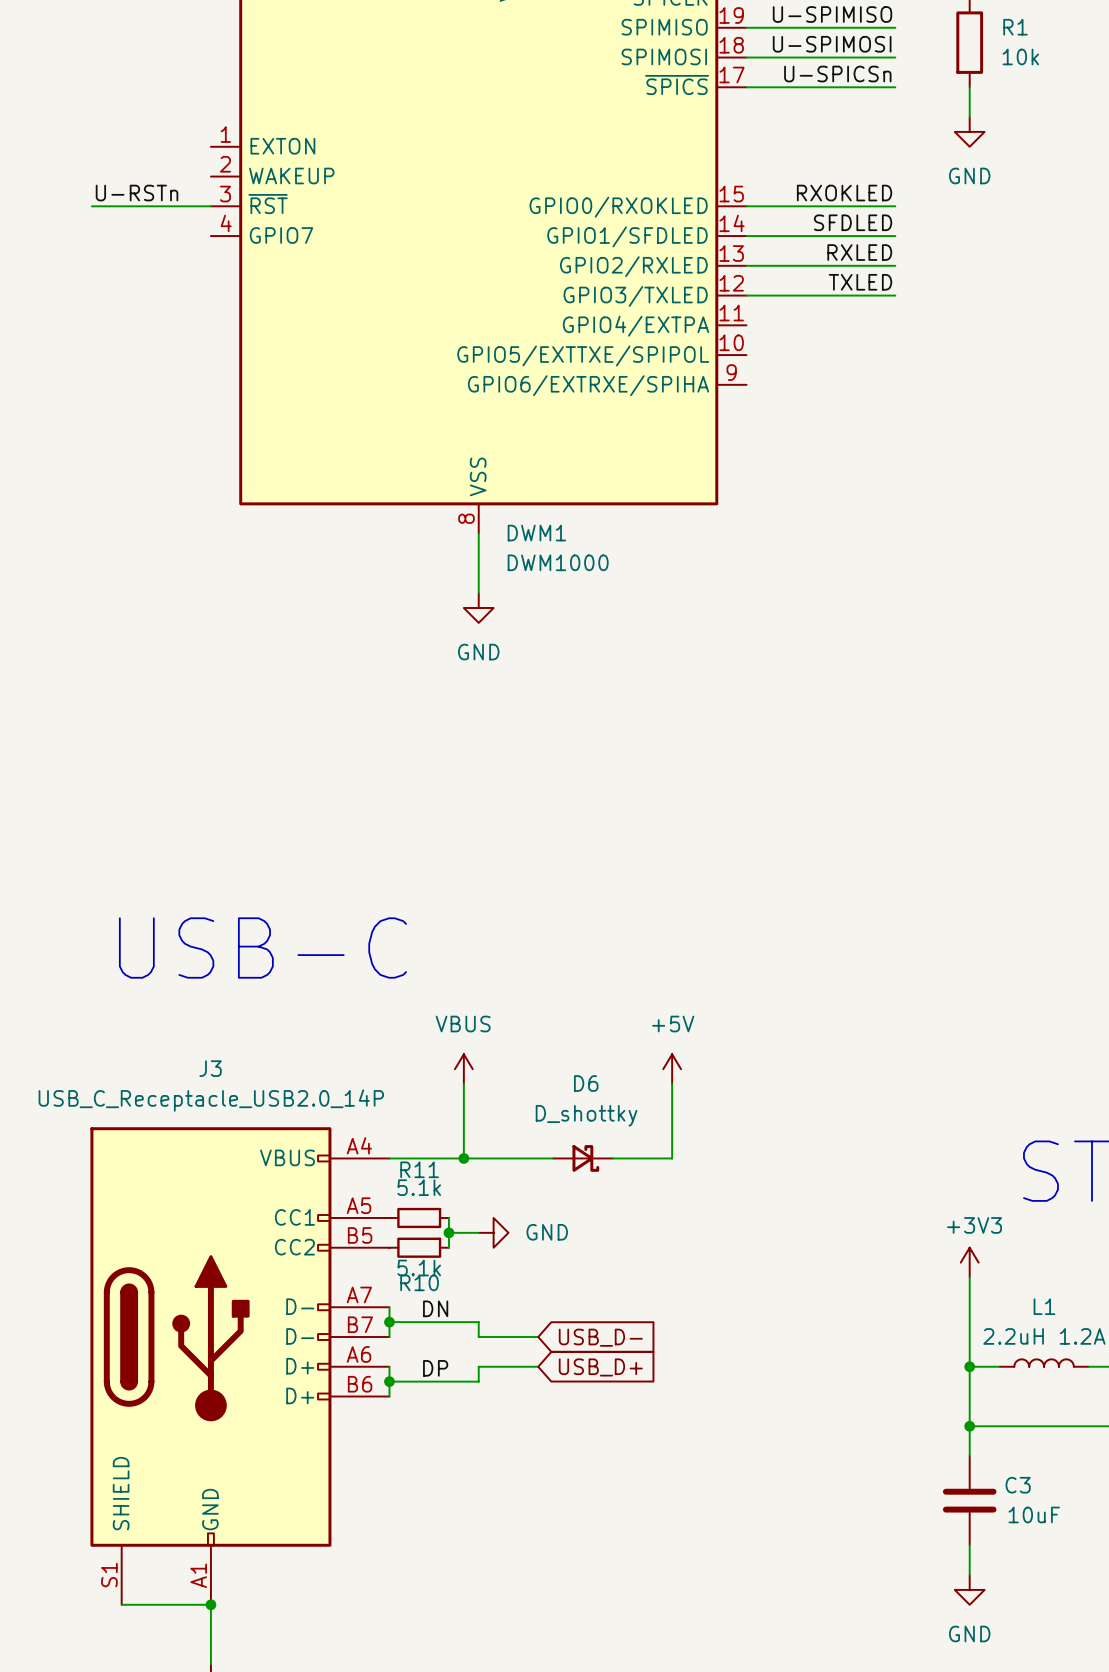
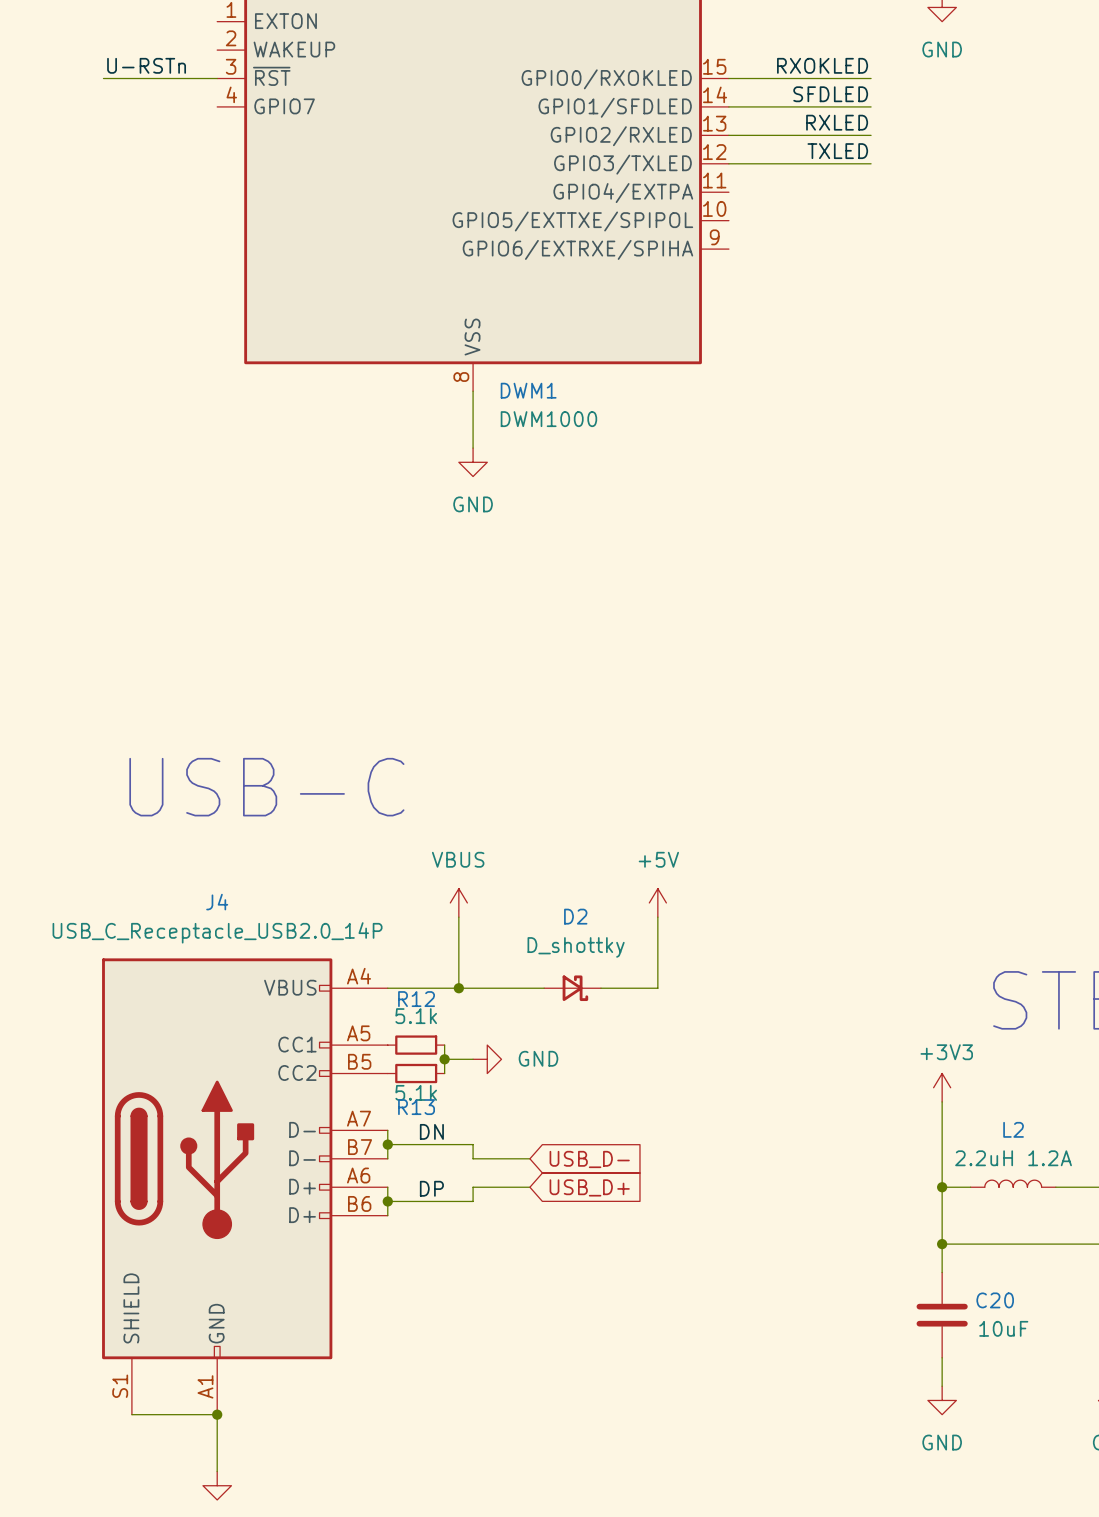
J3 name: J3 (210, 1068) -> J4 (217, 902)
D6 name: D6 (586, 1083) -> D2 (575, 916)
R11 name: R11 (419, 1169) -> R12 (416, 999)
R10 name: R10 (419, 1282) -> R13 (416, 1107)
L1 name: L1 (1044, 1306) -> L2 (1013, 1129)
C3 name: C3 (1018, 1485) -> C20 (995, 1300)

